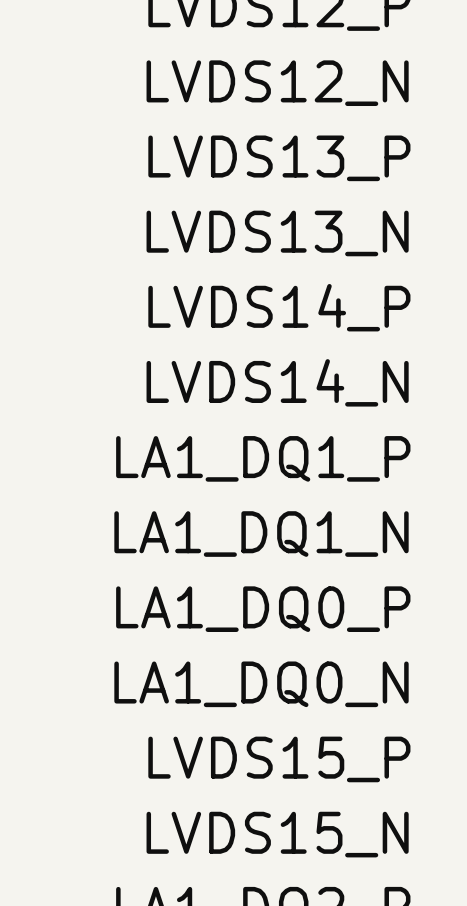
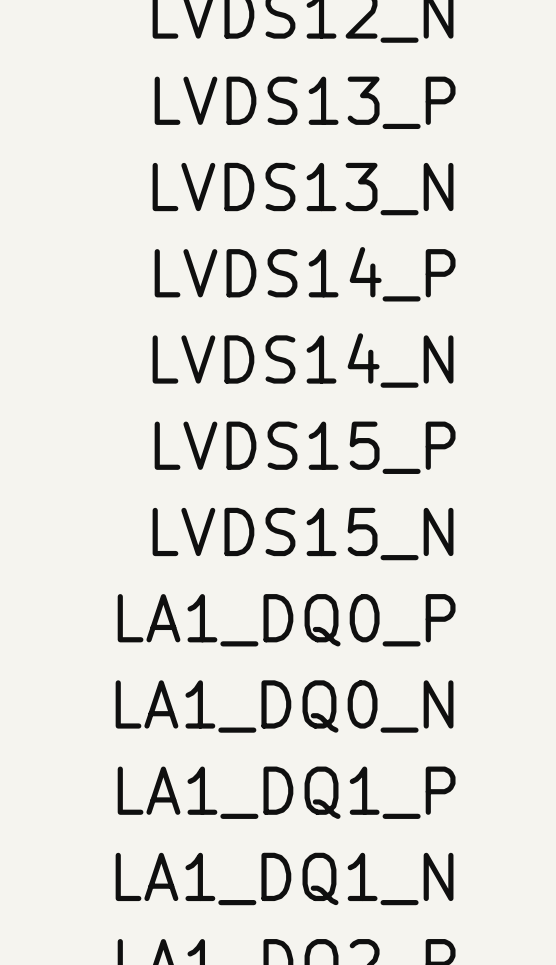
label: LA1_DQ1_P (263, 458) -> LVDS15_P (305, 447)
label: LA1_DQ1_N (261, 534) -> LVDS15_N (303, 534)
label: LVDS15_P (279, 759) -> LA1_DQ1_P (286, 792)
label: LVDS15_N (277, 834) -> LA1_DQ1_N (284, 878)

